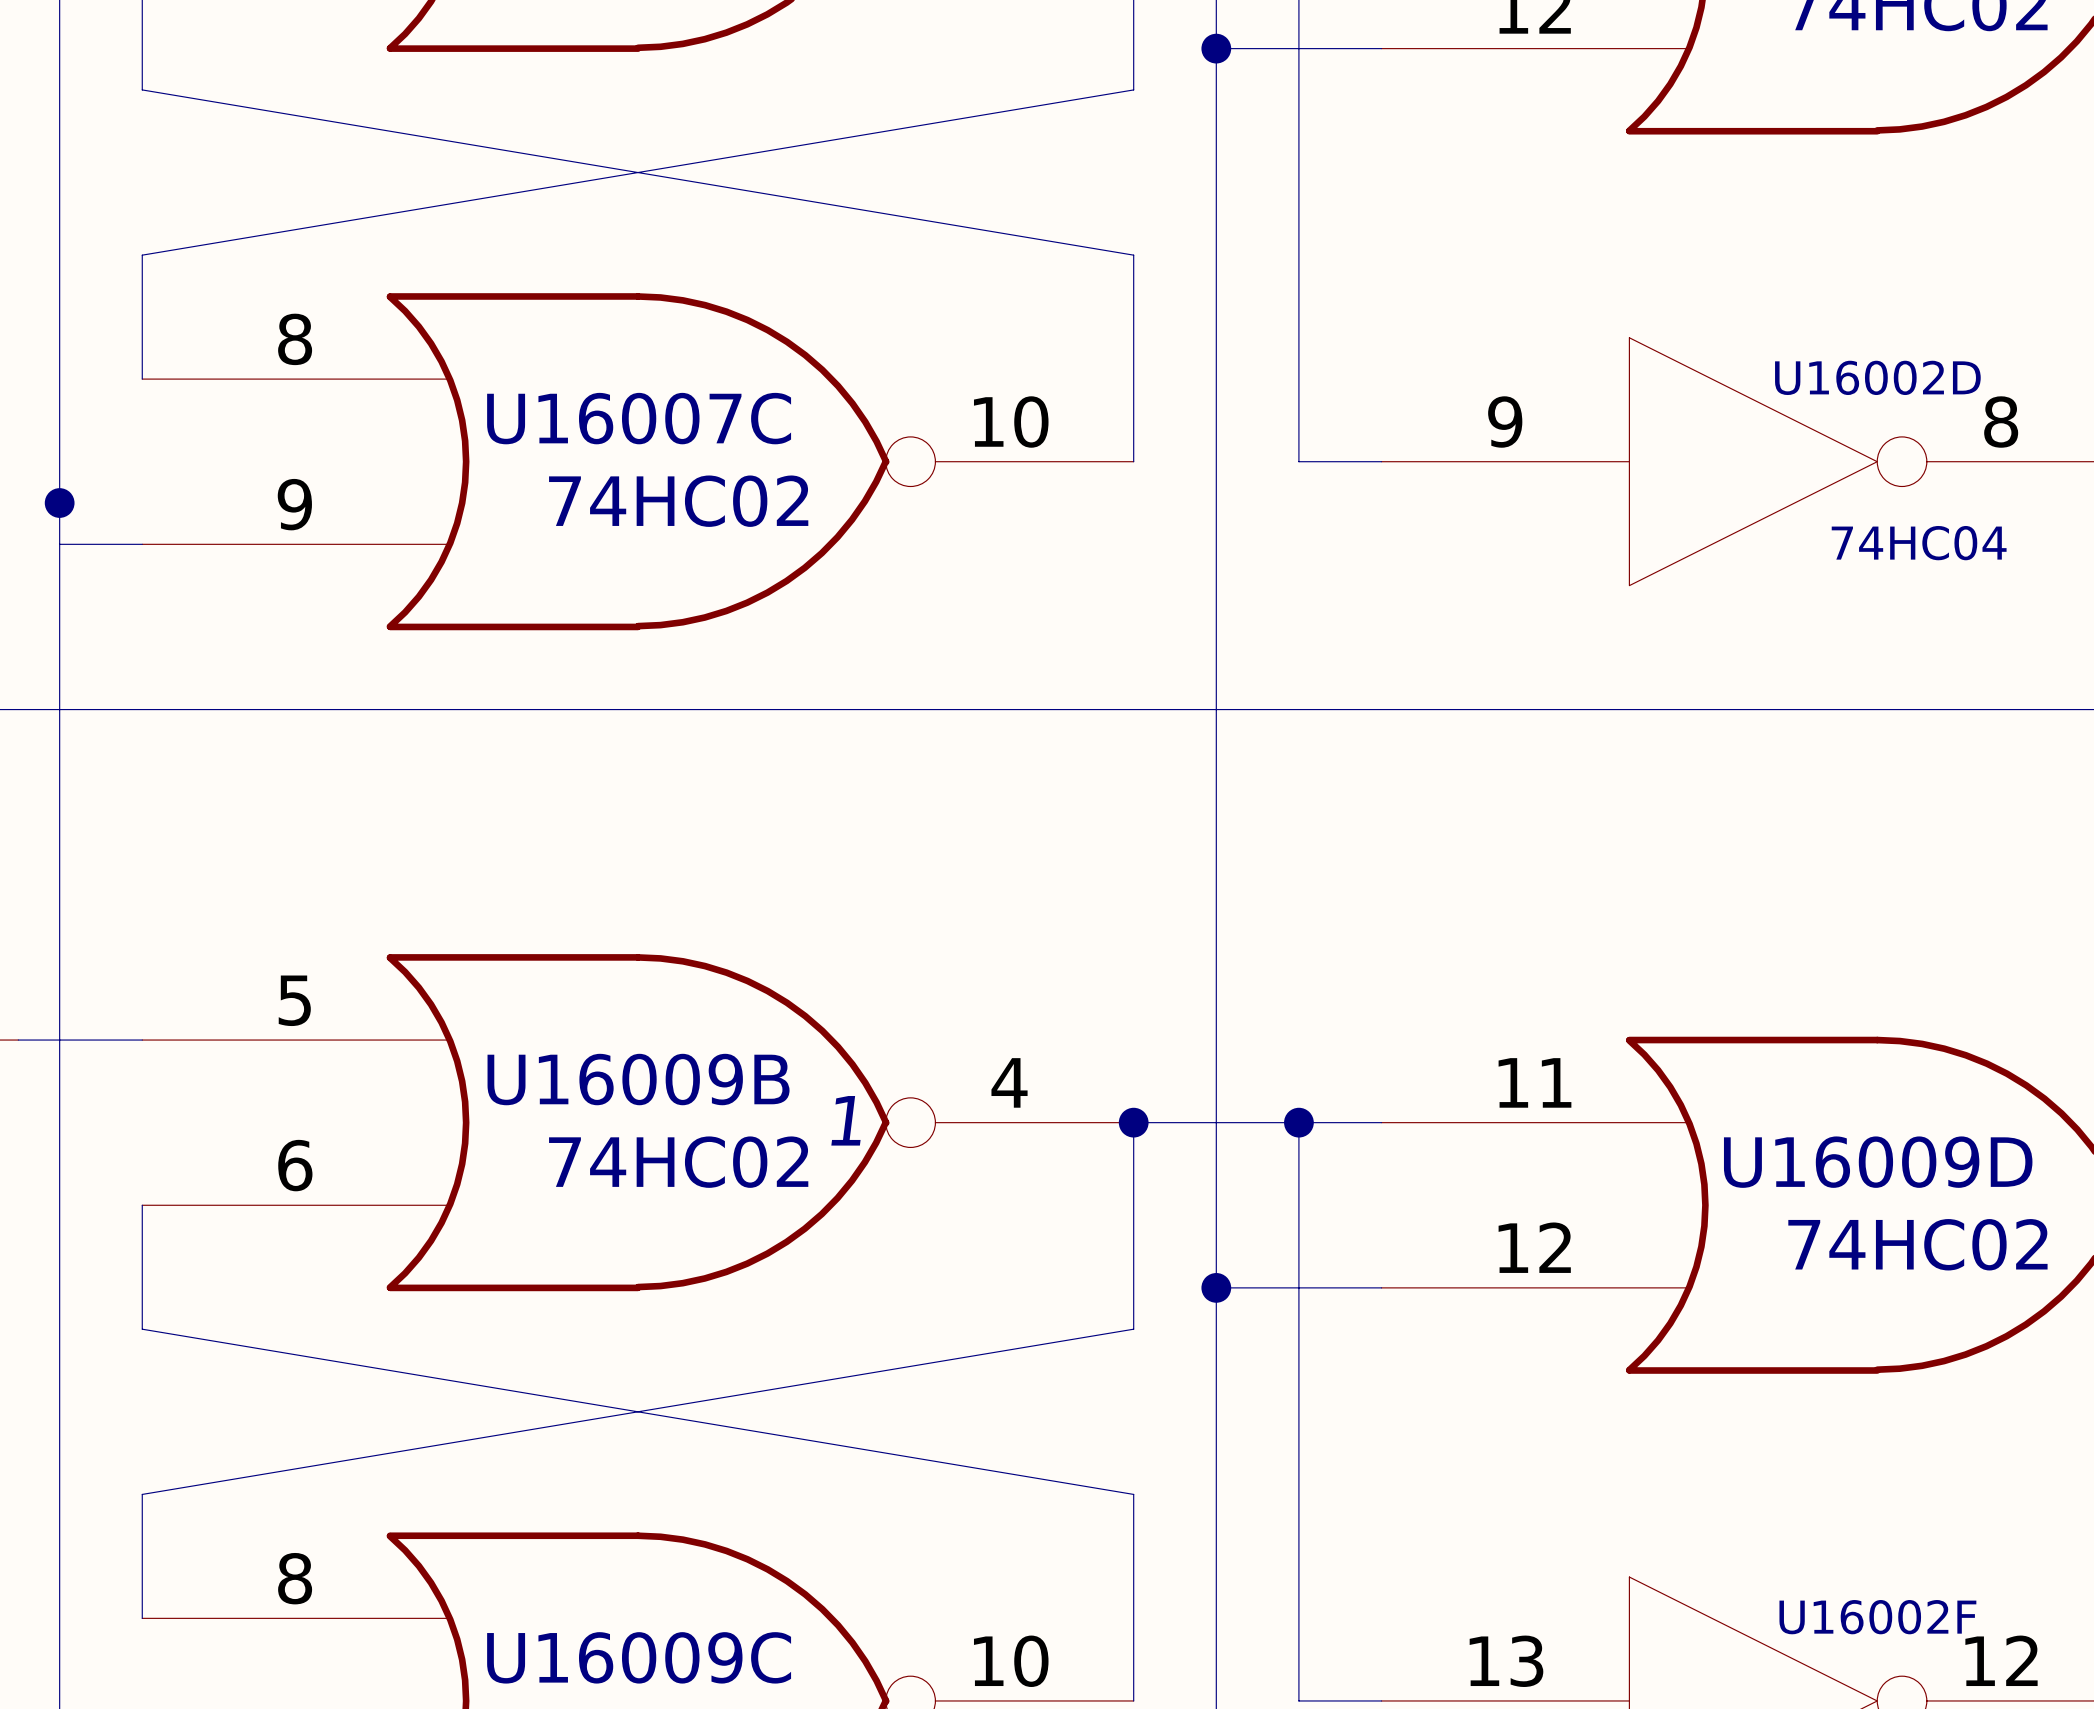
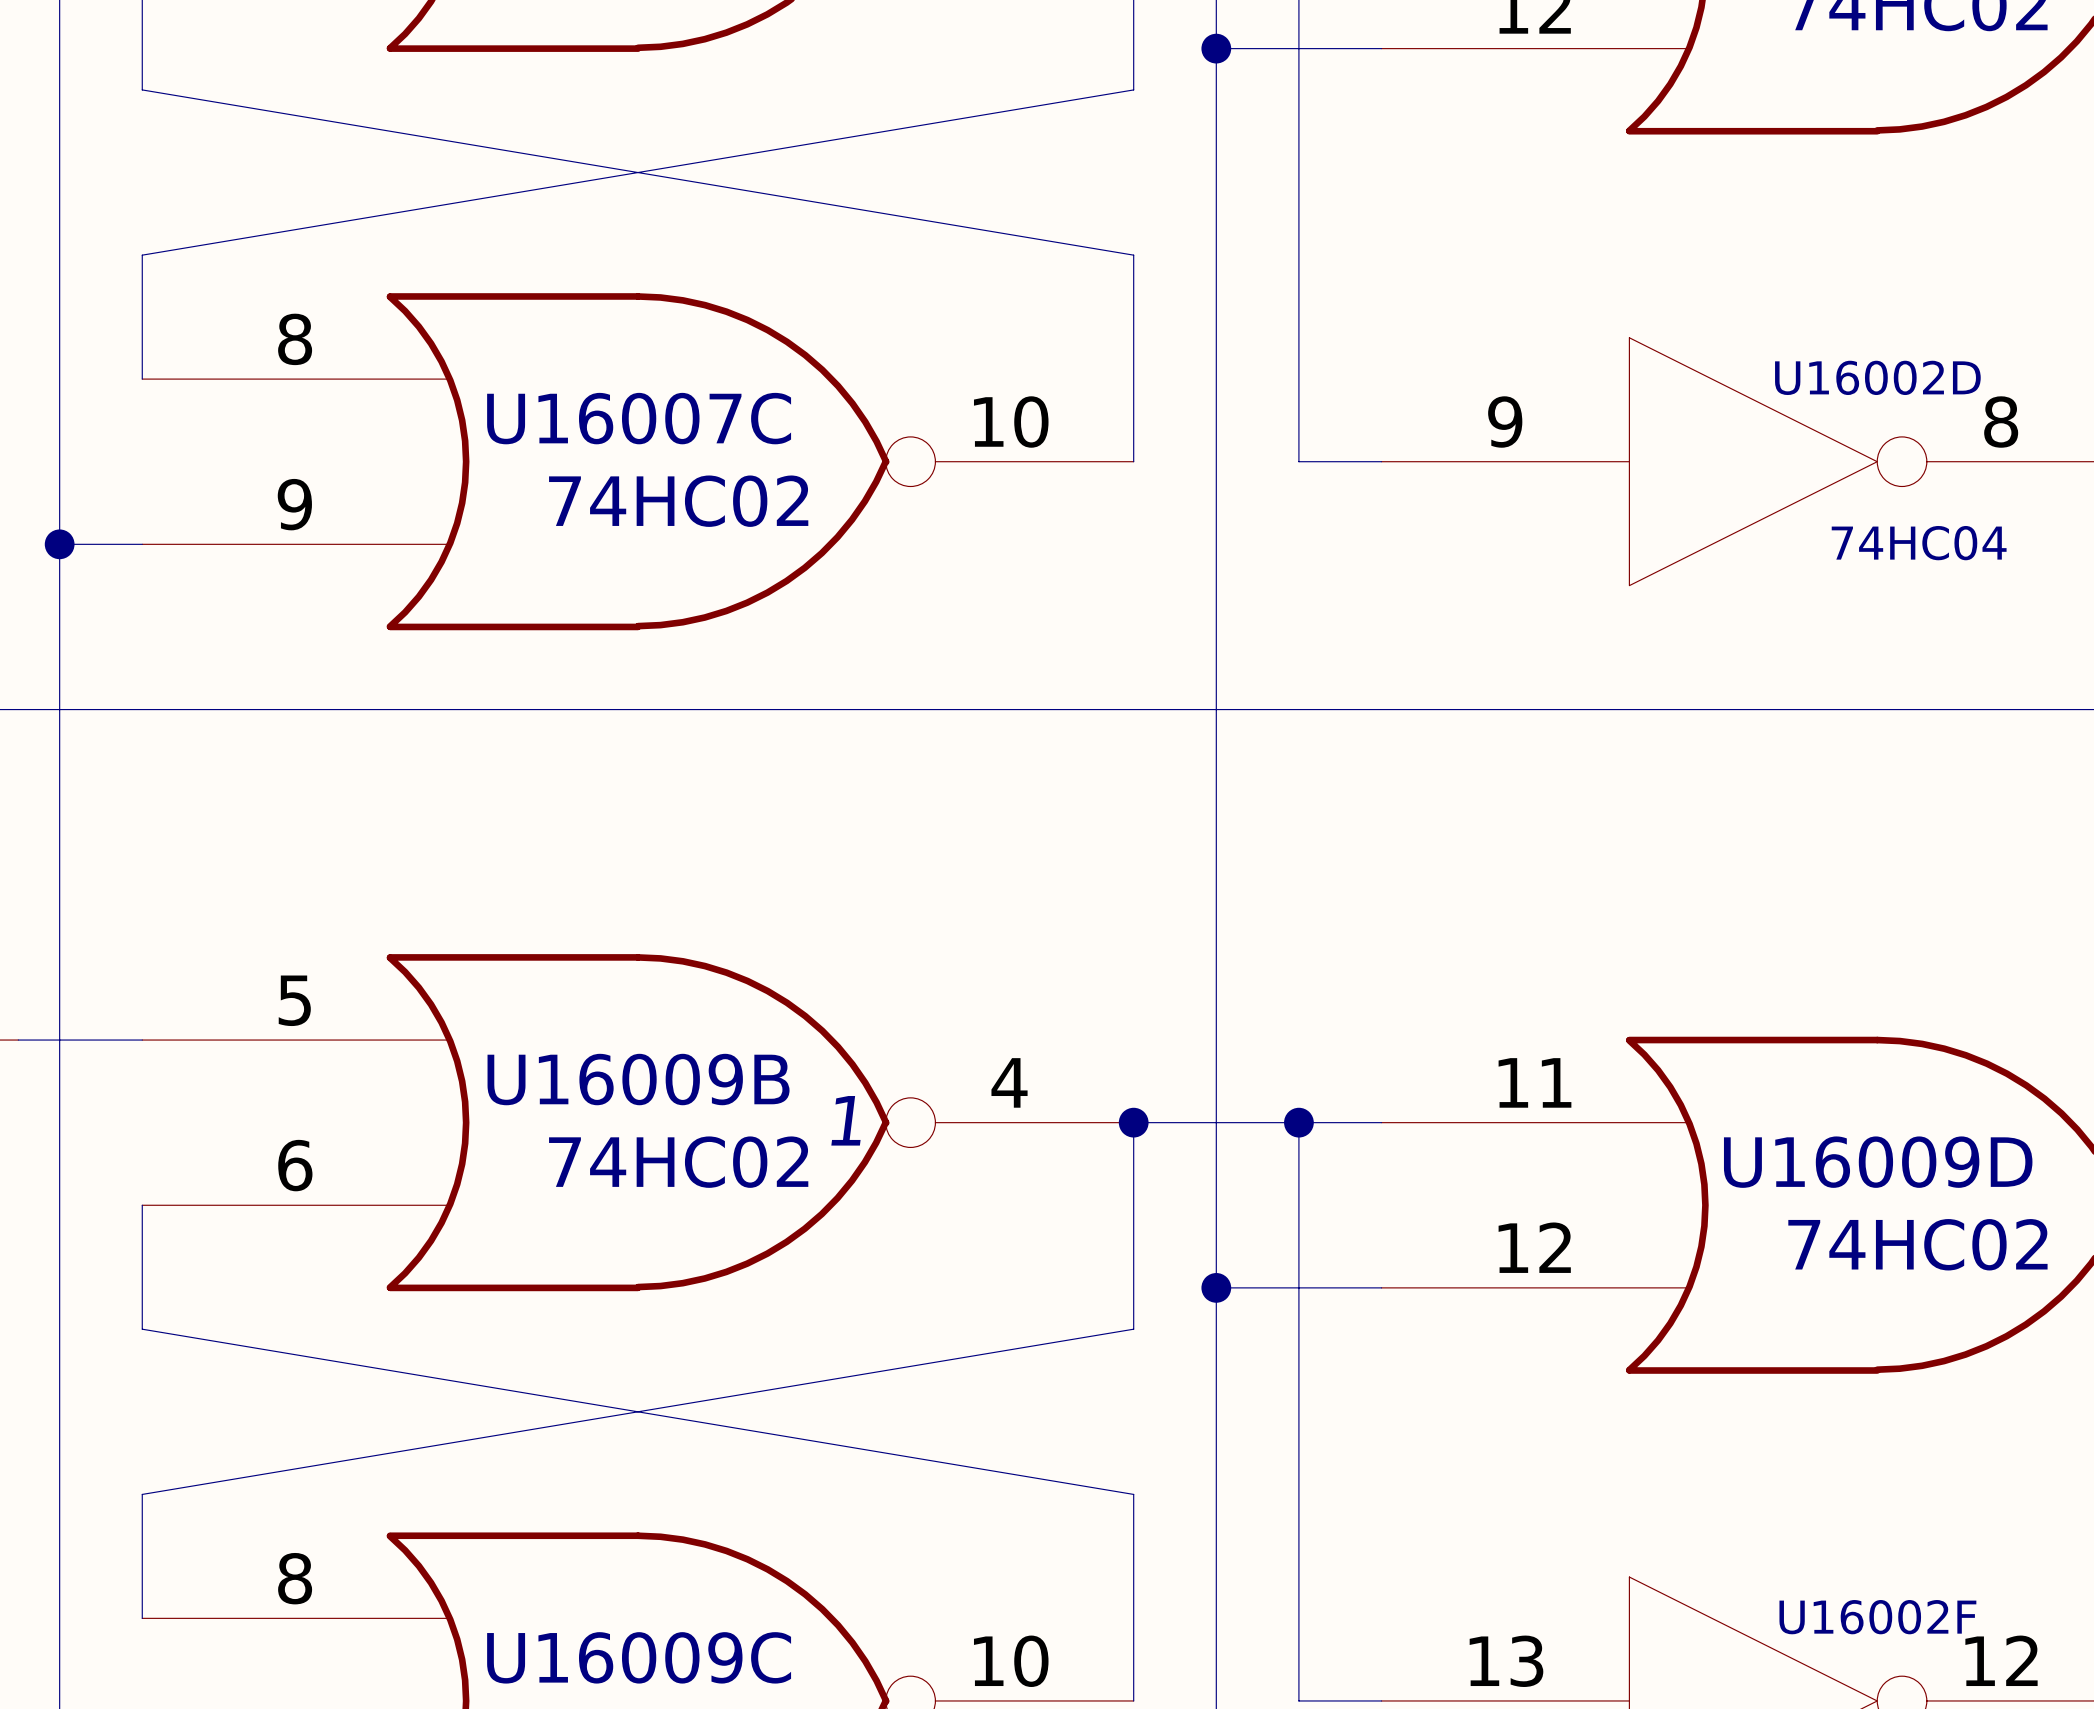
junction position: (59, 503) -> (59, 544)

